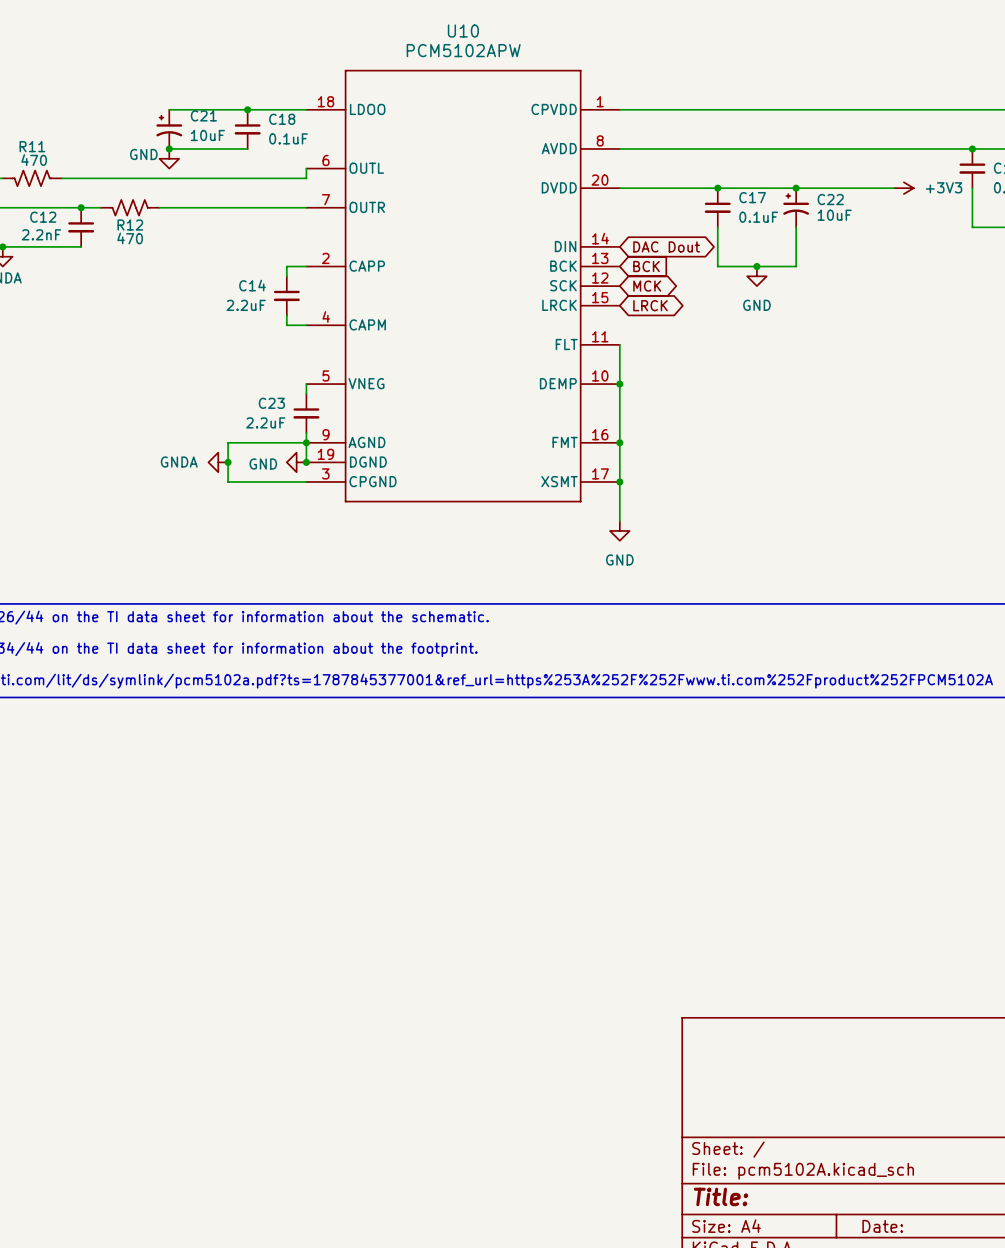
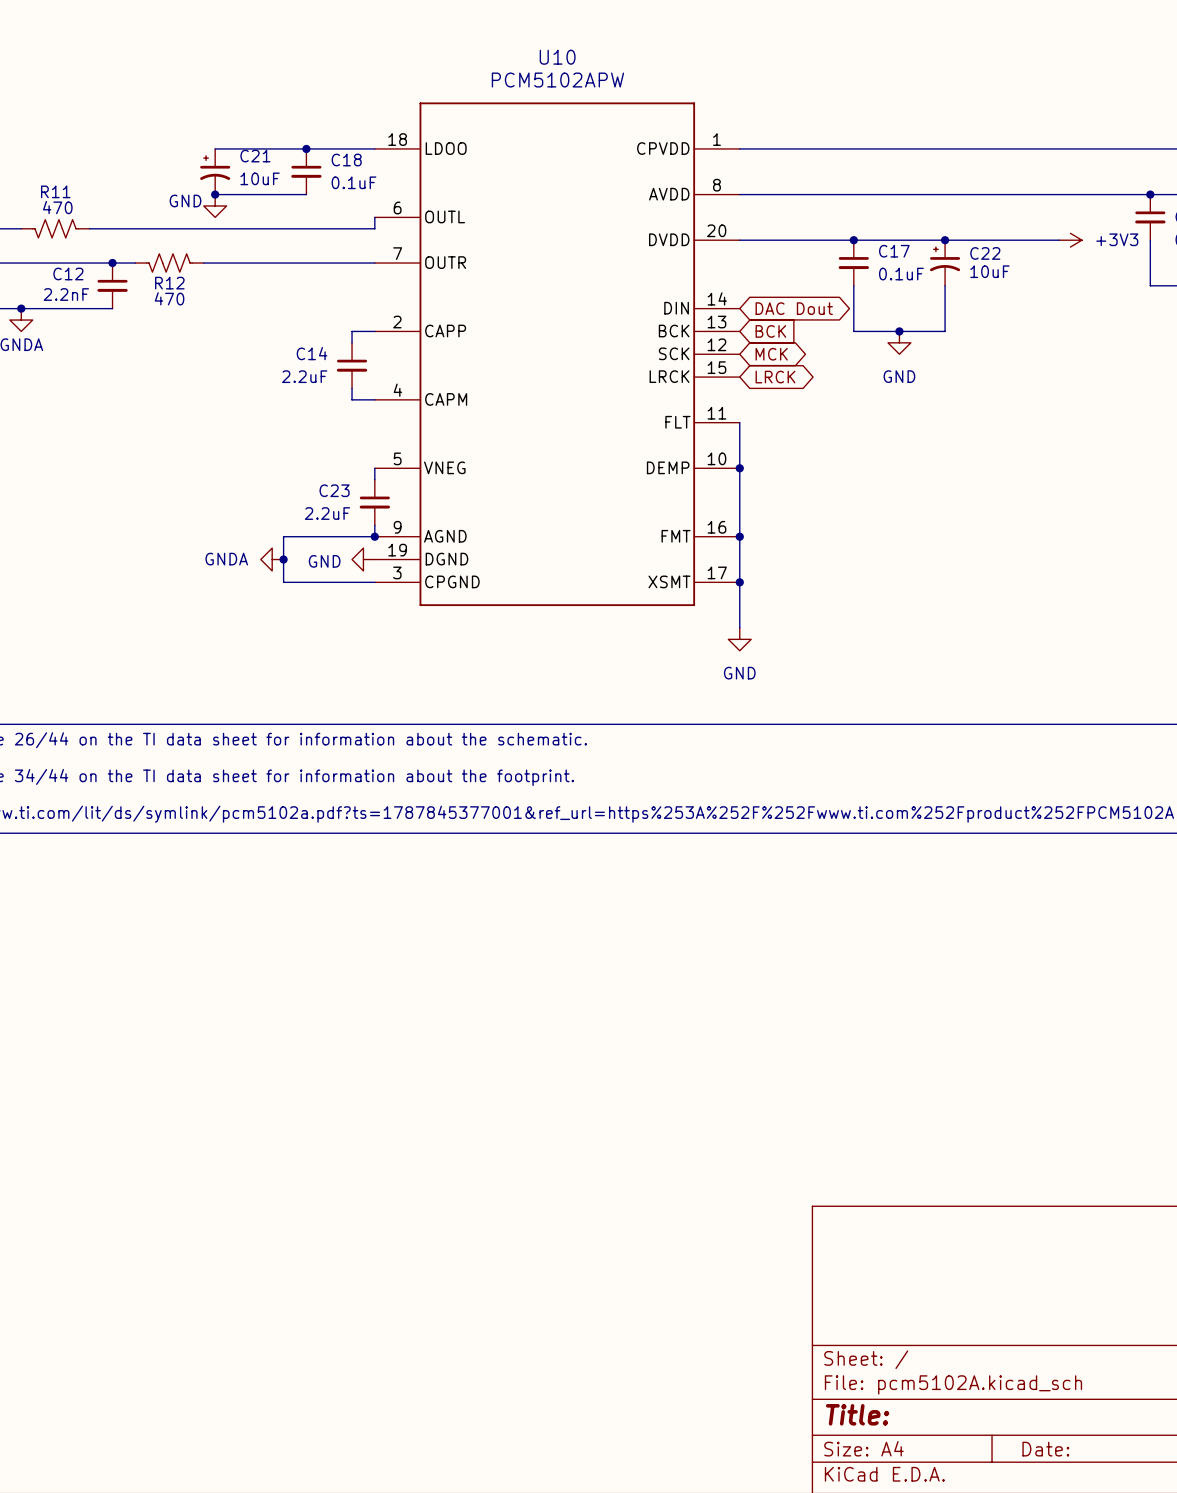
wire: (306, 442) (306, 462) -> none
junction: (306, 462) -> none

